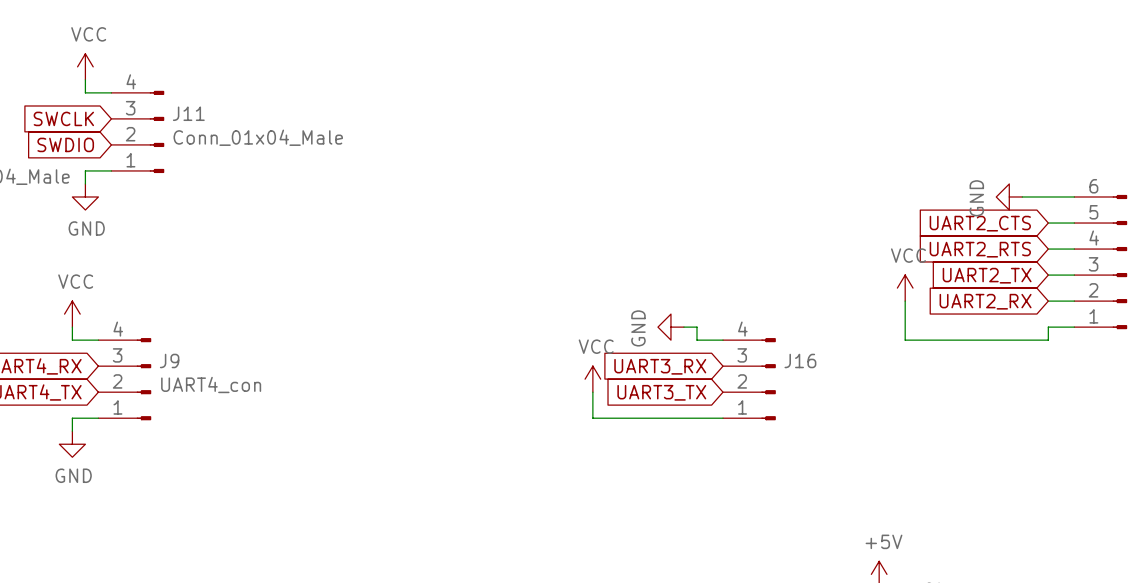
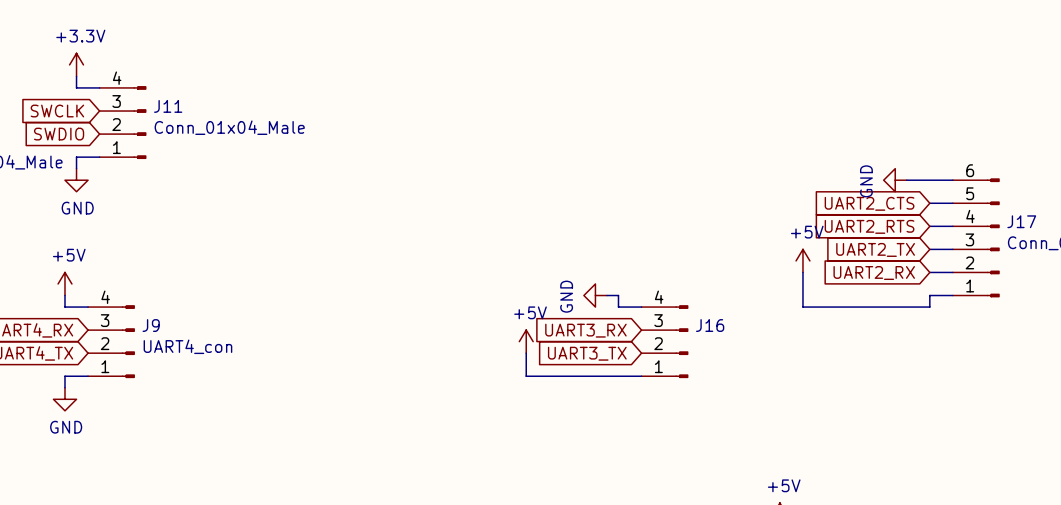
power symbol: VCC (85, 66) -> +3.3V (76, 64)
power symbol: VCC (905, 288) -> +5V (802, 260)
power symbol: VCC (72, 314) -> +5V (64, 283)
power symbol: VCC (592, 379) -> +5V (526, 341)

